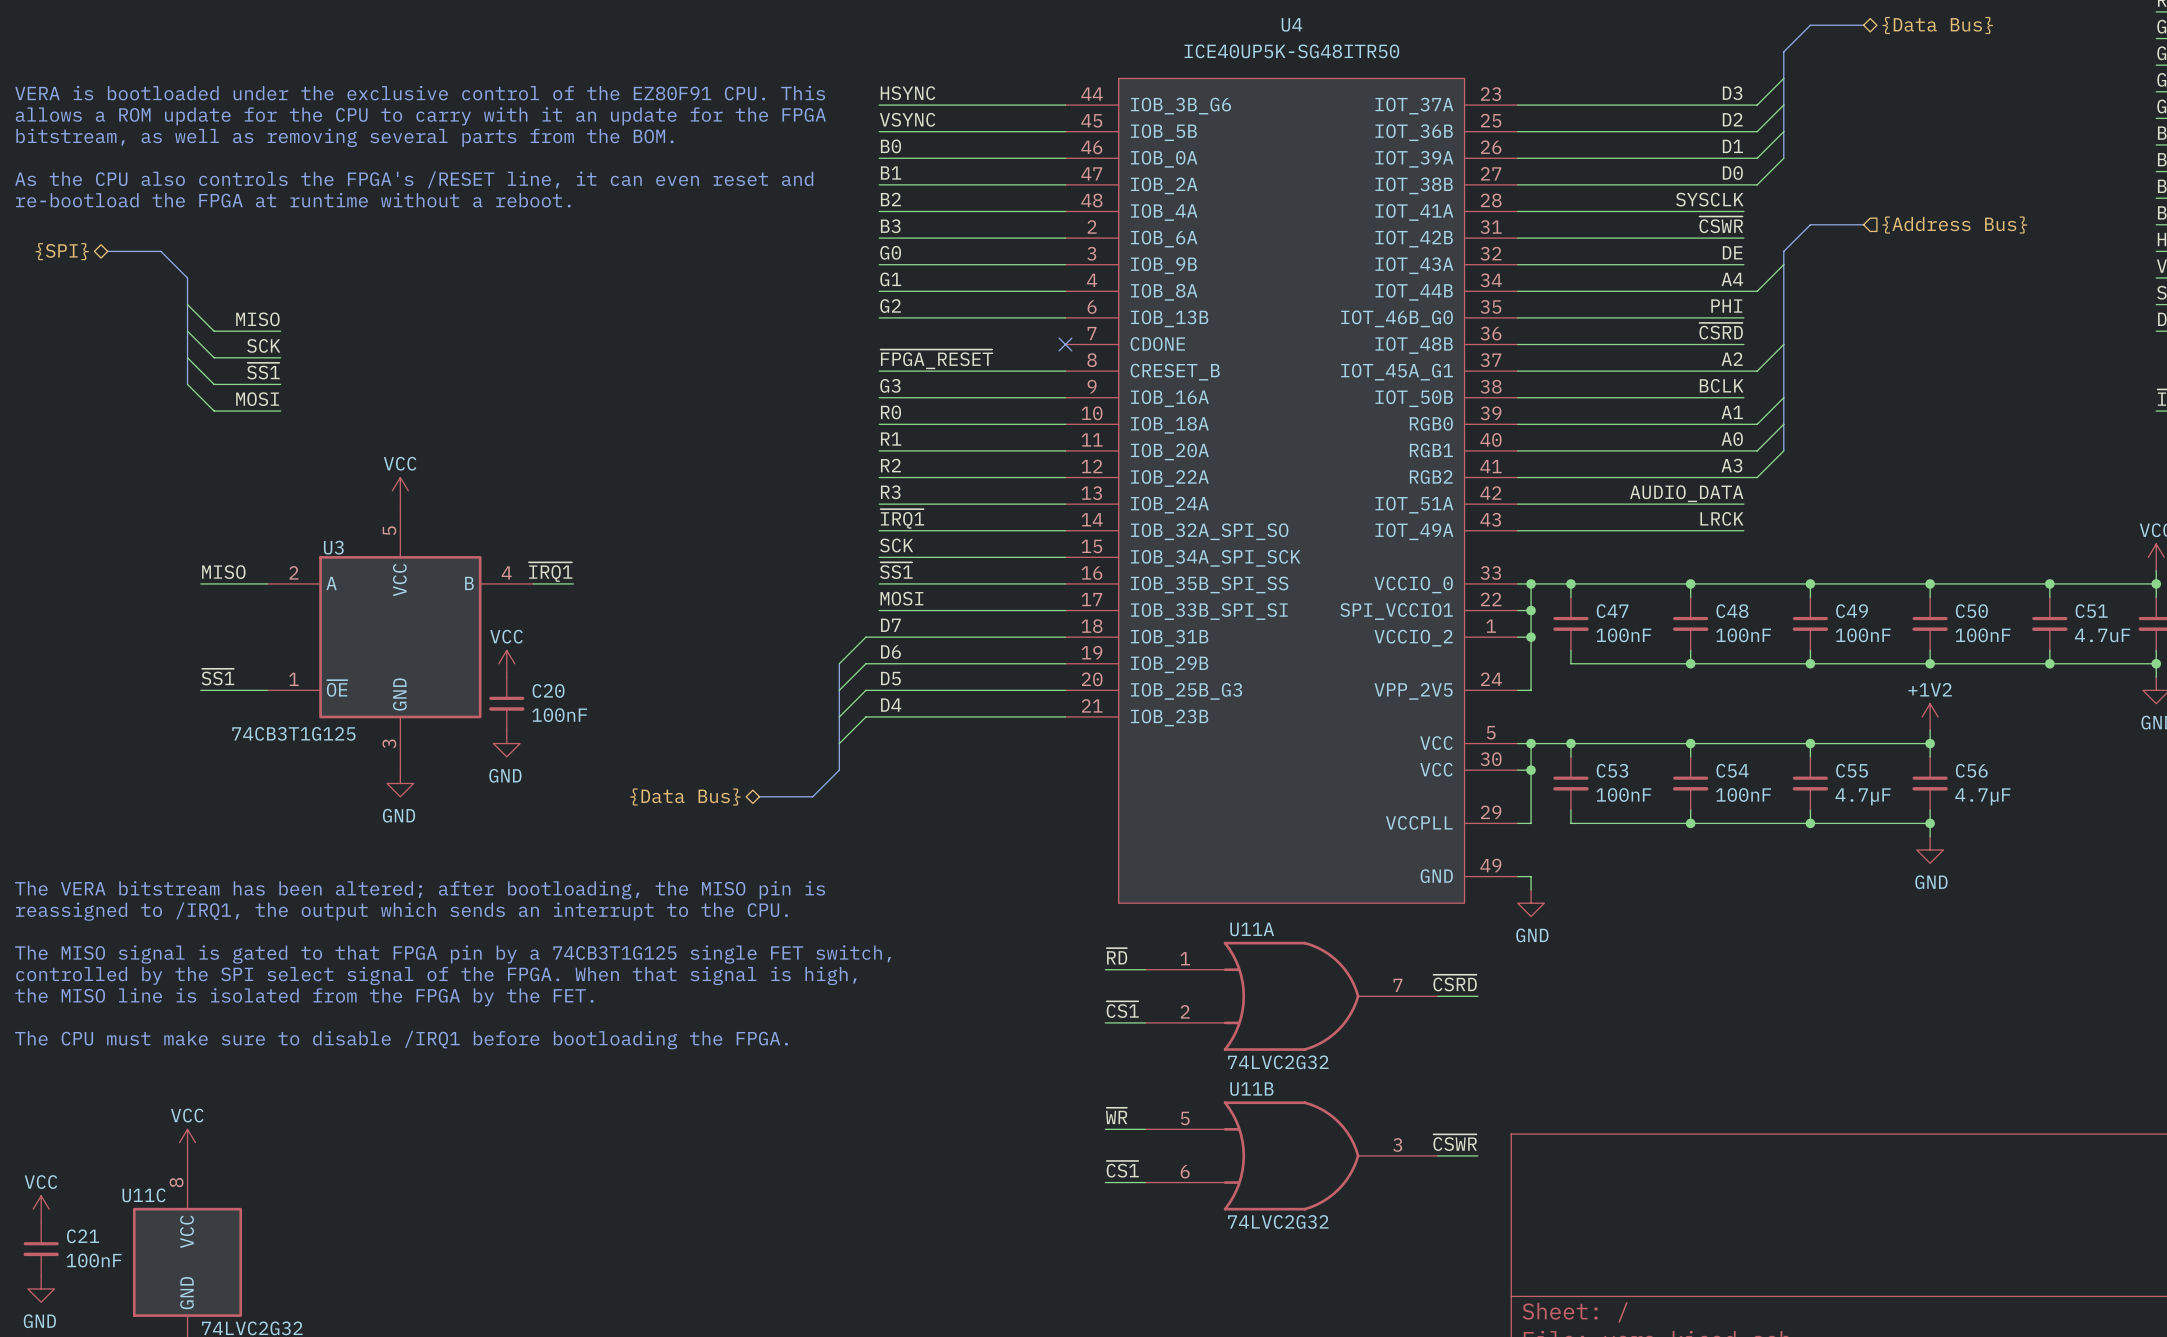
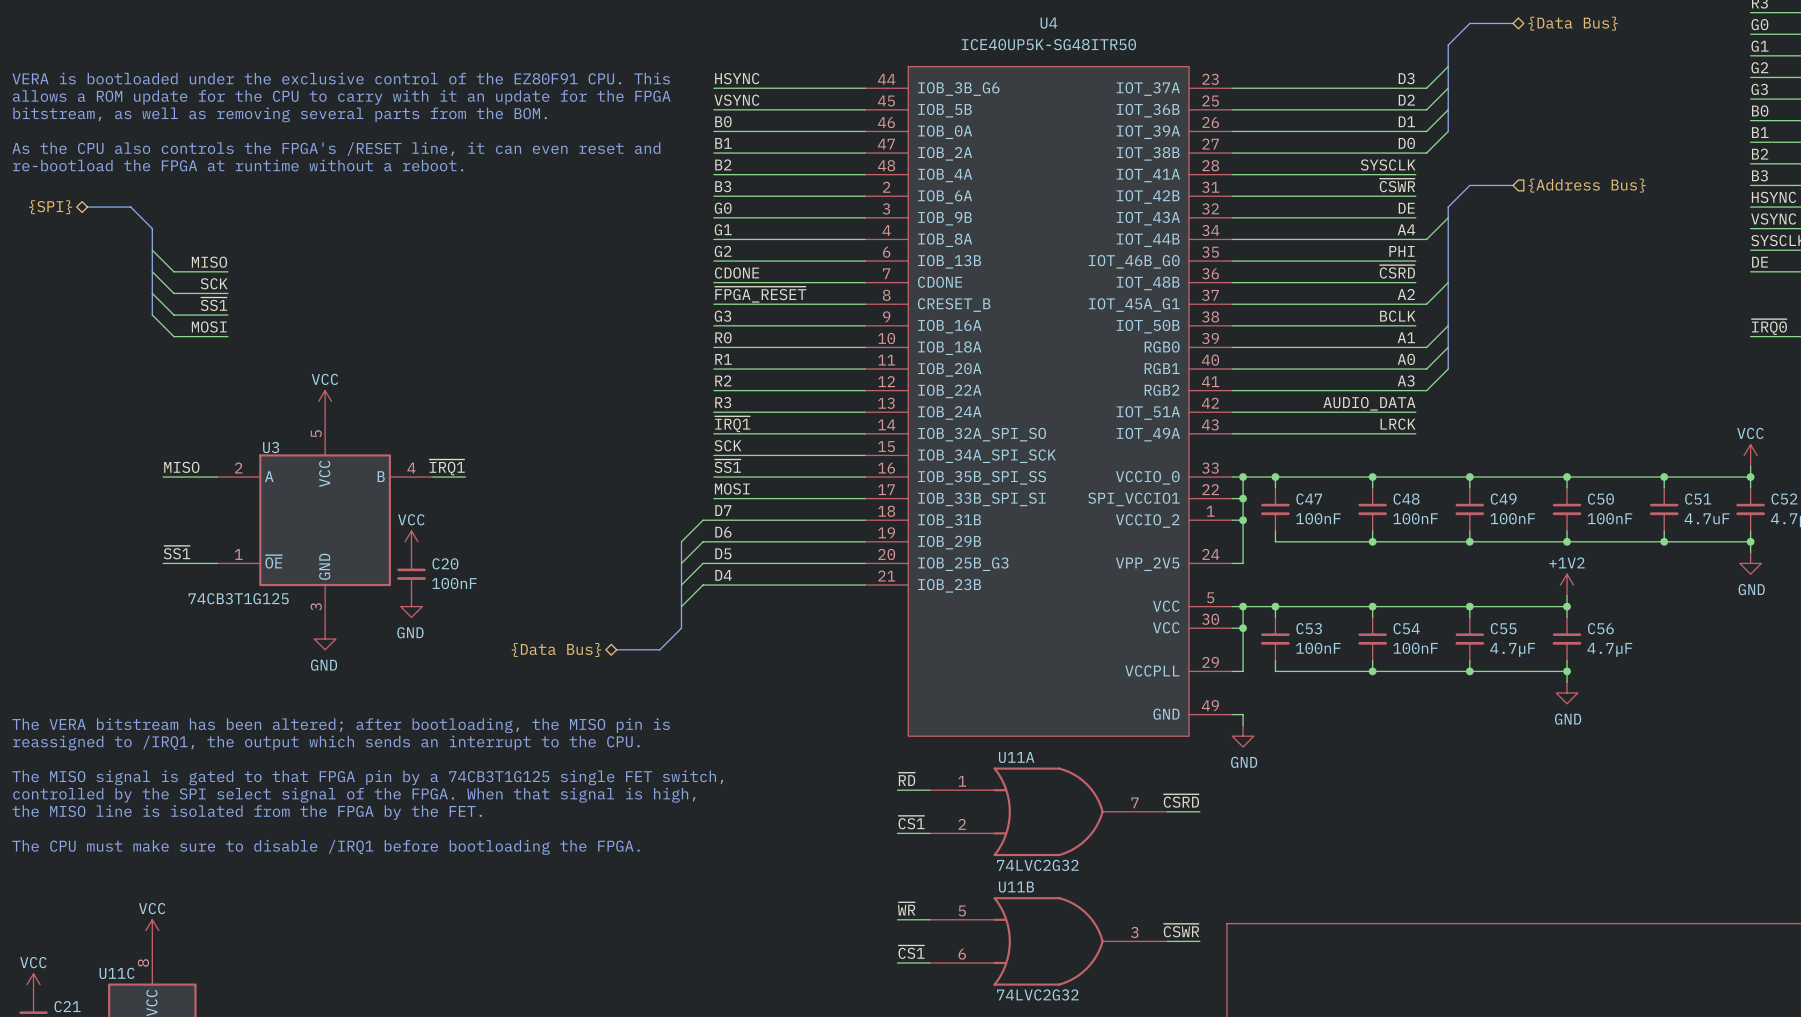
label: none -> CDONE (737, 272)
wire: none -> (713, 282) (865, 282)
no-connect mark: (1065, 344) -> none

